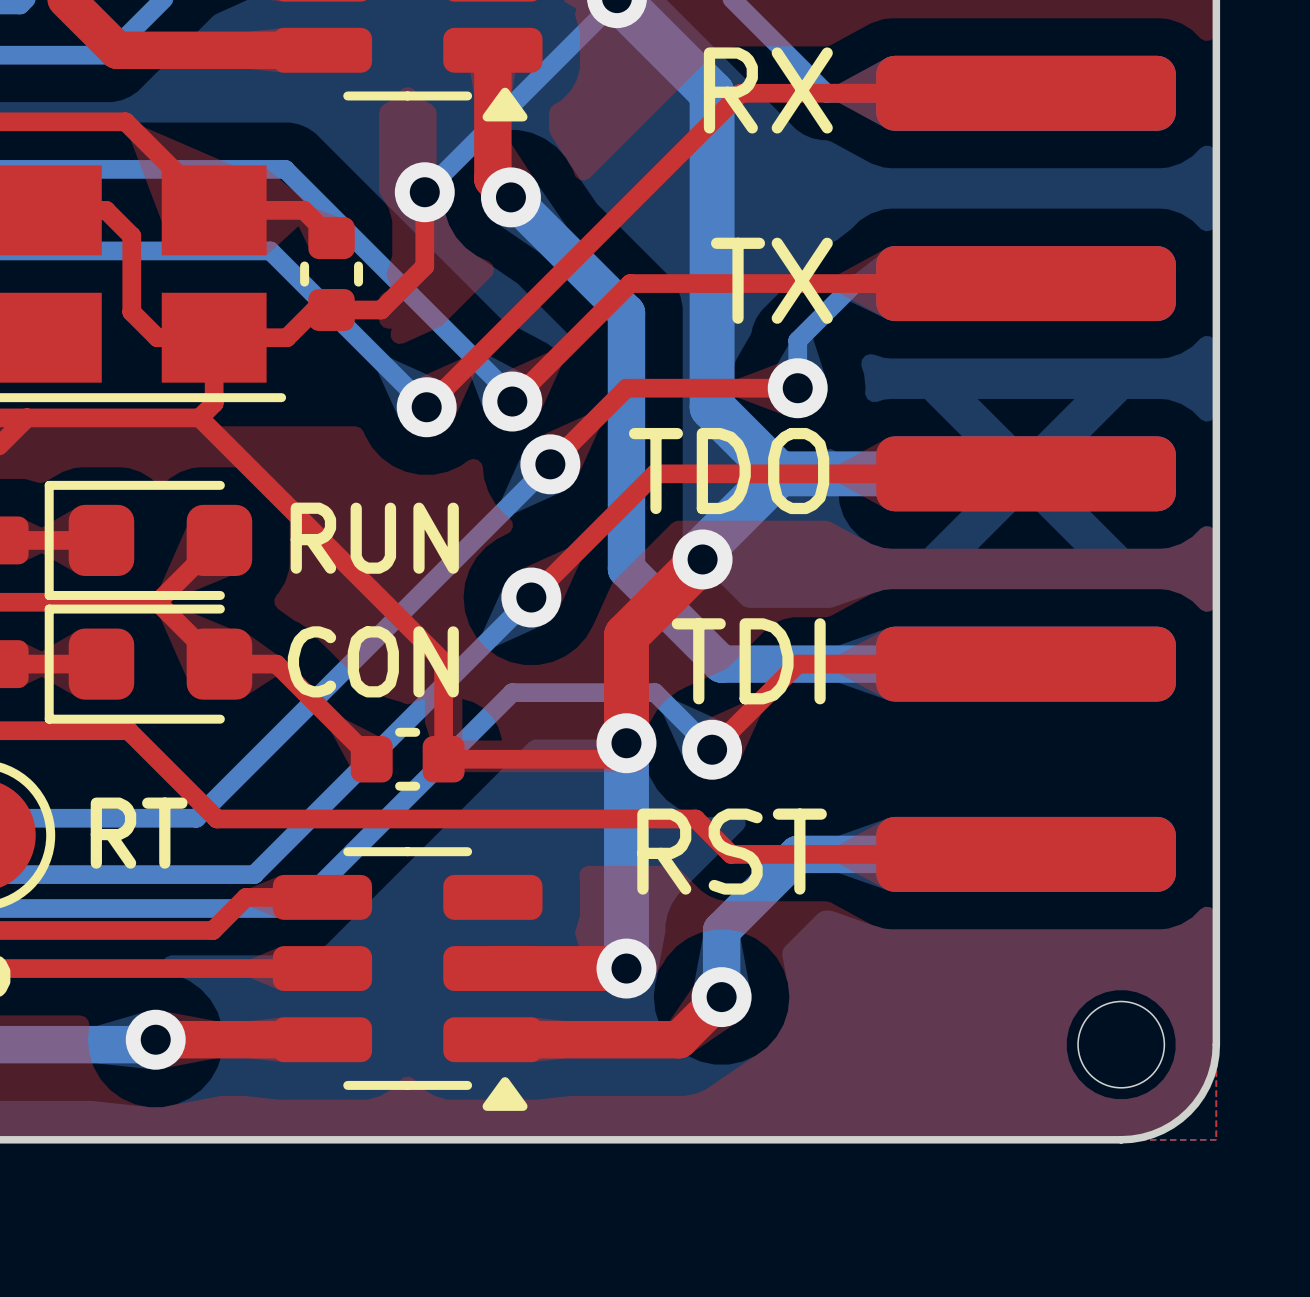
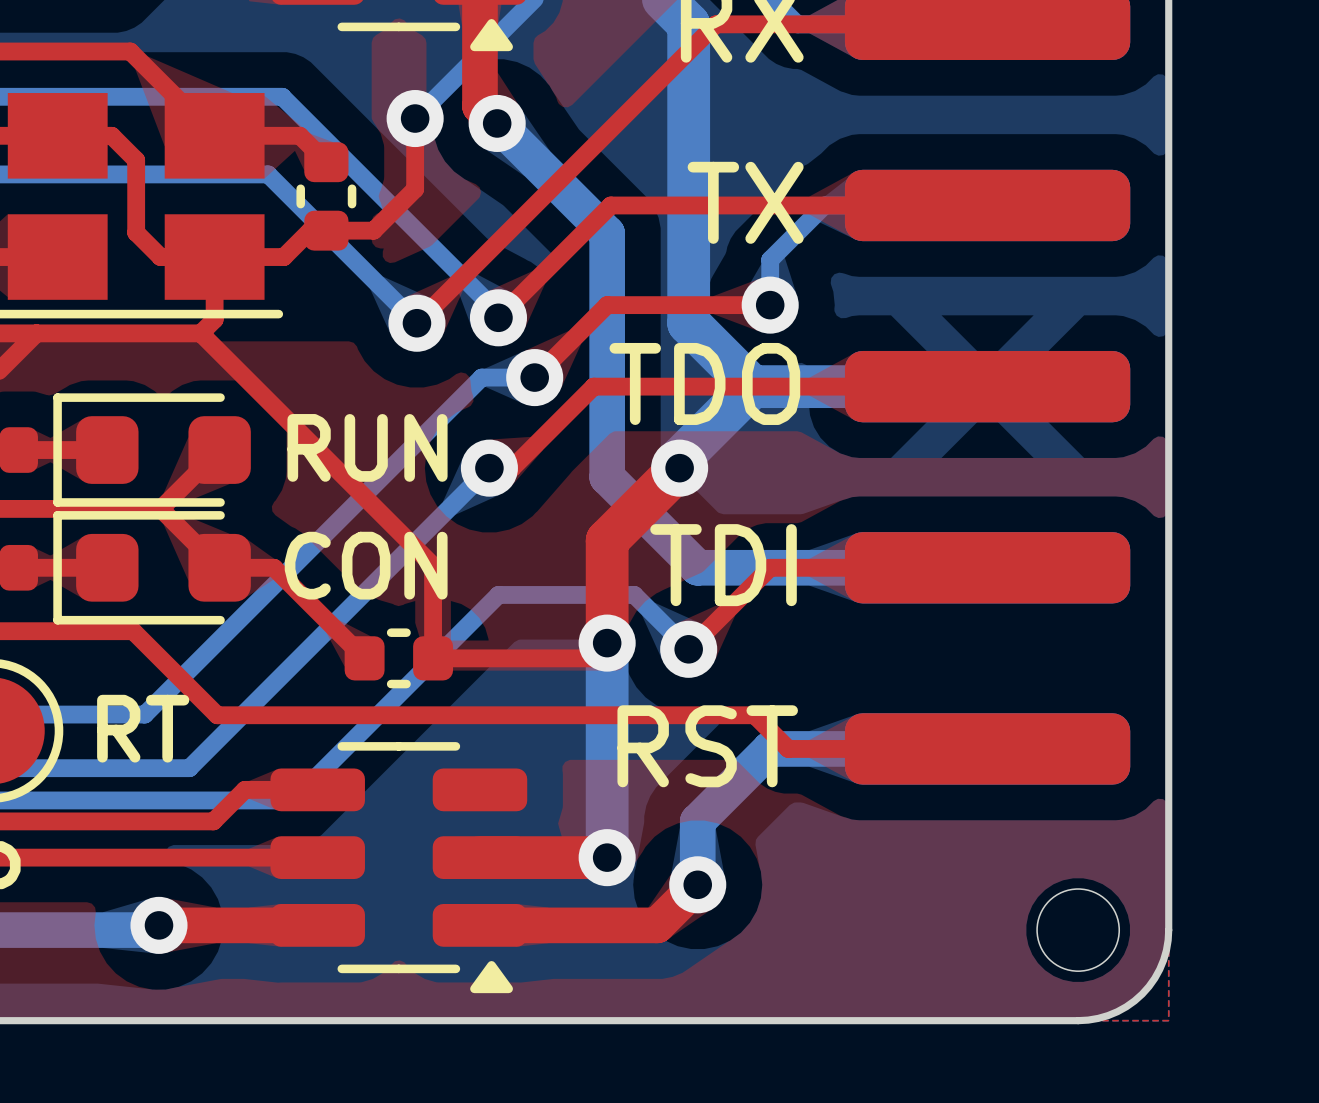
bottom track: (550, 464) (196, 818) (140, 818) -> (534, 377) (481, 377) (144, 714)
top track: (655, 473) (531, 597) -> (634, 386) (593, 386) (512, 468) (489, 468)
bottom track: (531, 597) (254, 874) (187, 874) -> (489, 468) (189, 768)
via position: (531, 597) -> (489, 468)
top track: (695, 819) (731, 854) (816, 854) -> (673, 715) (754, 715) (788, 748)

